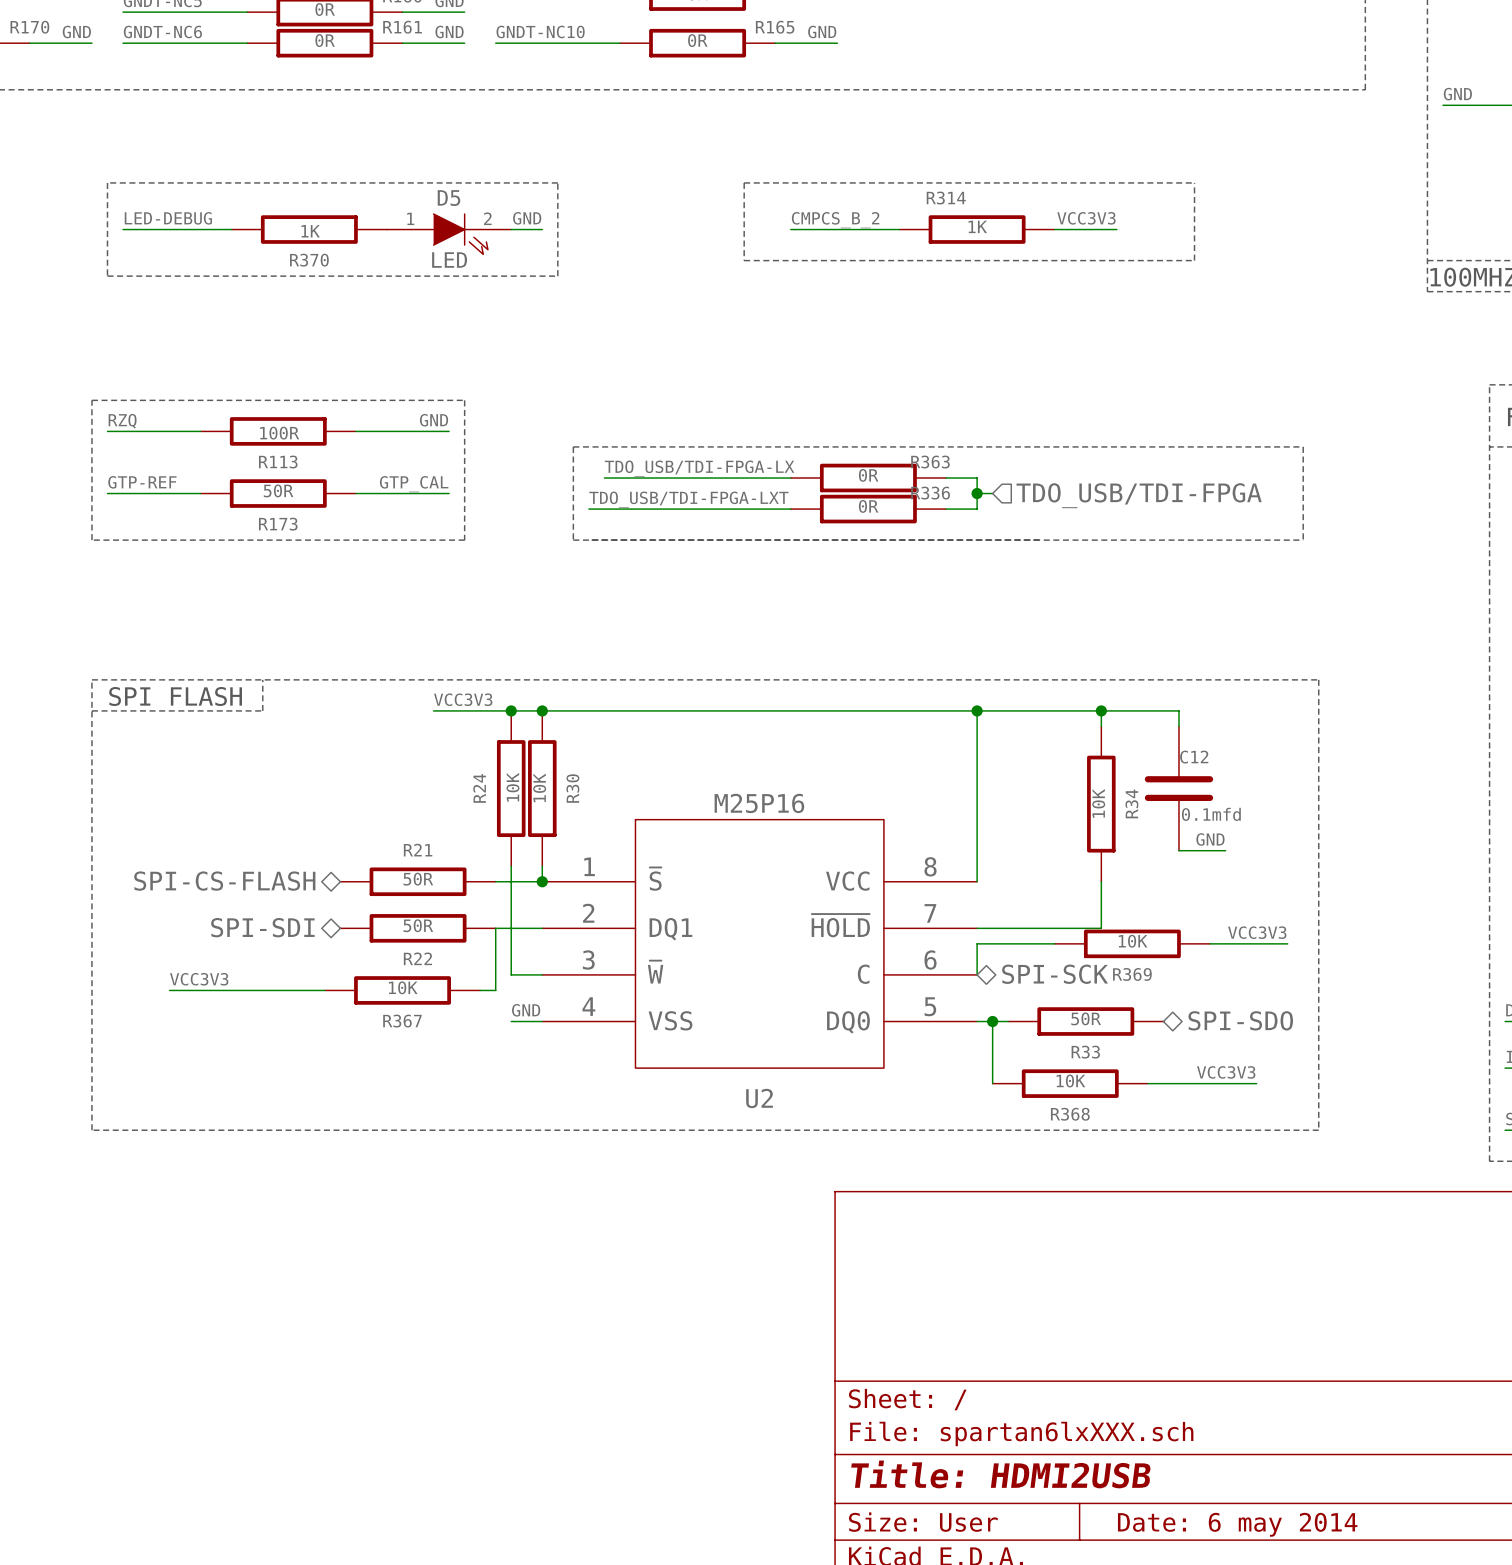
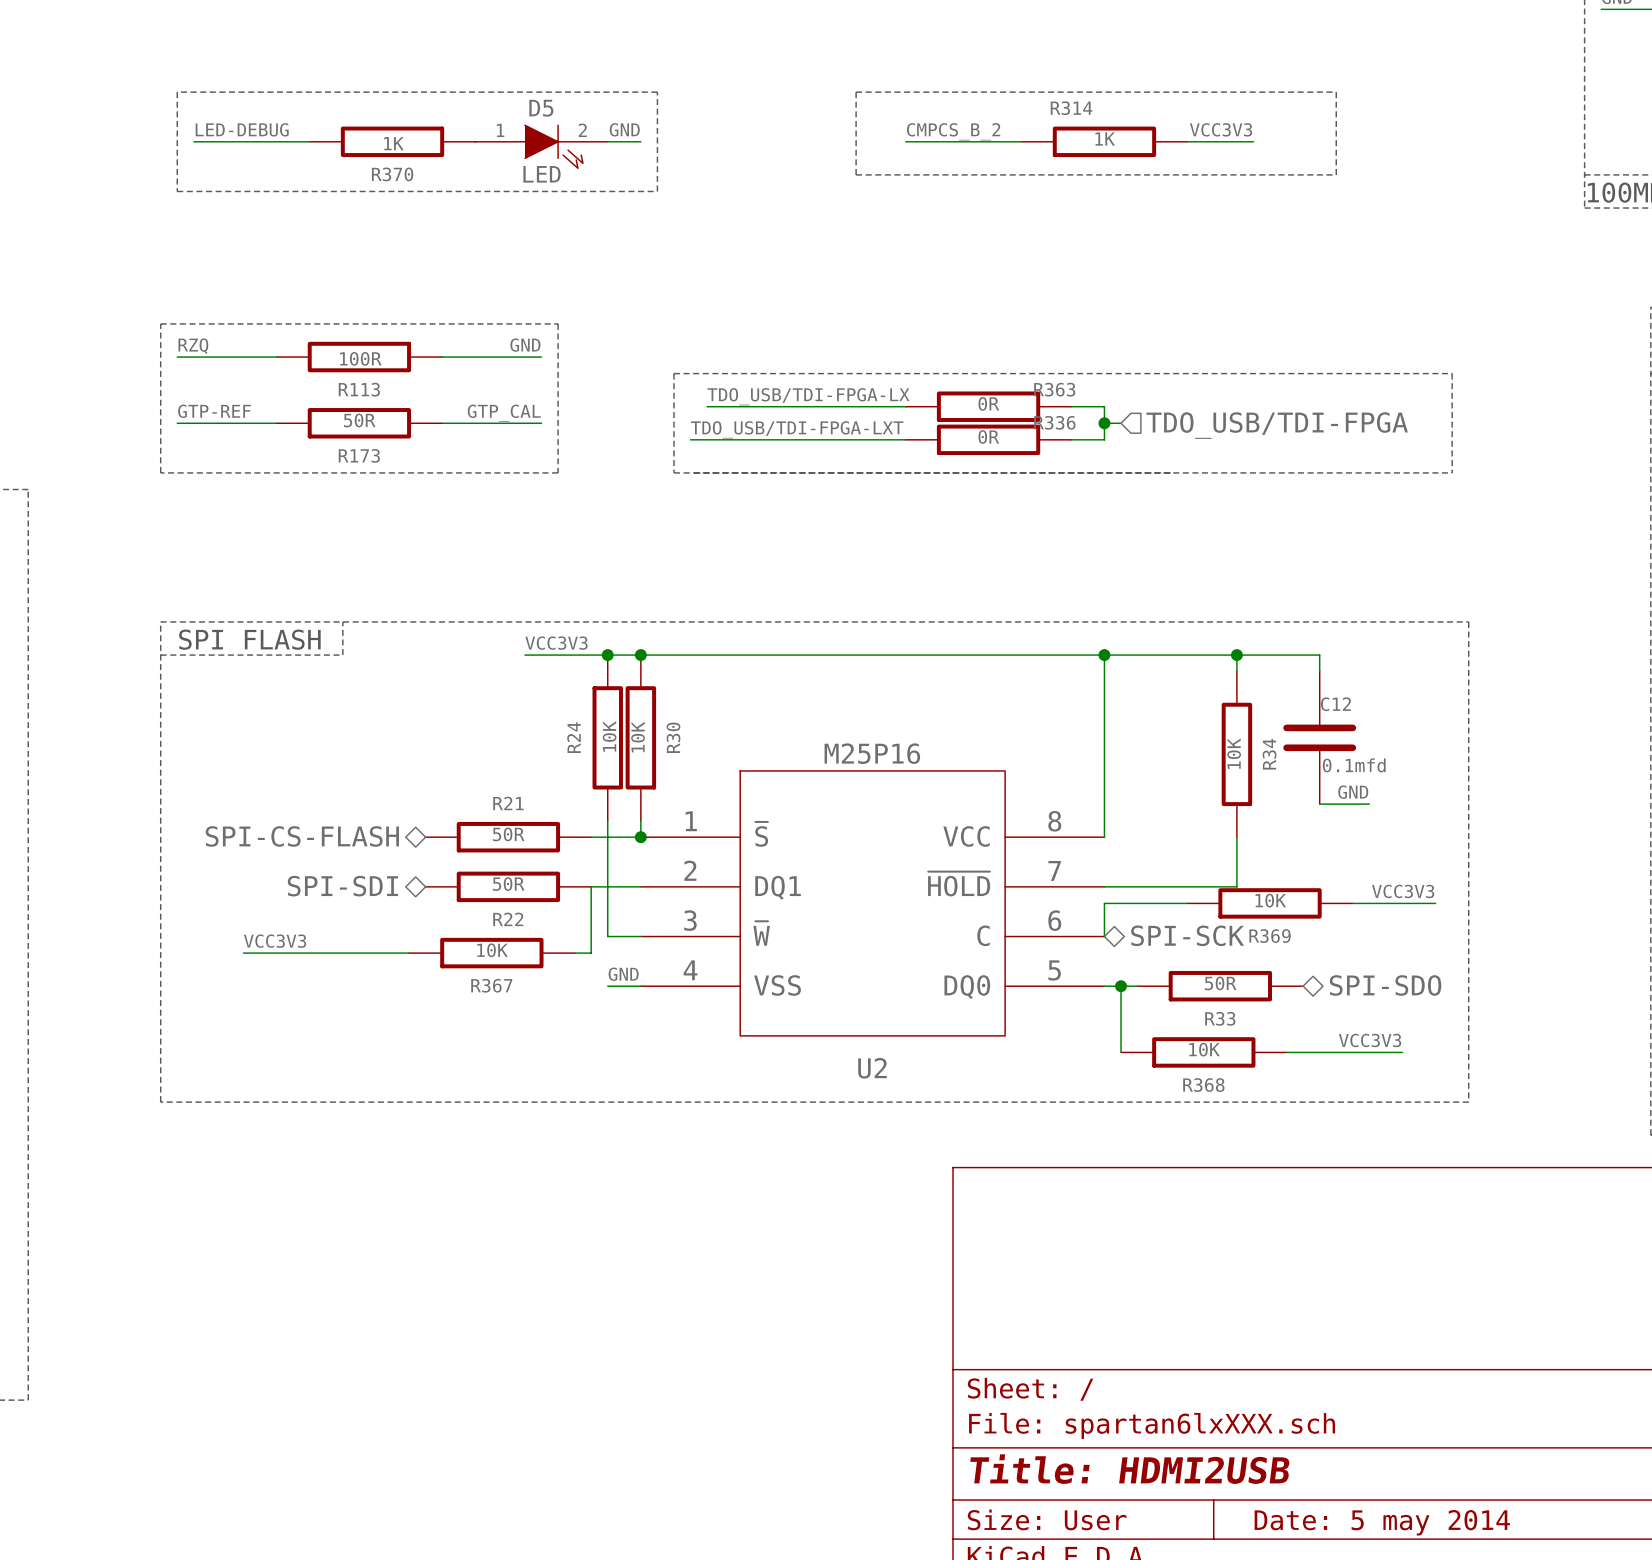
title block: Date: 6 may 2014 (1237, 1524) -> Date: 5 may 2014 (1382, 1522)

